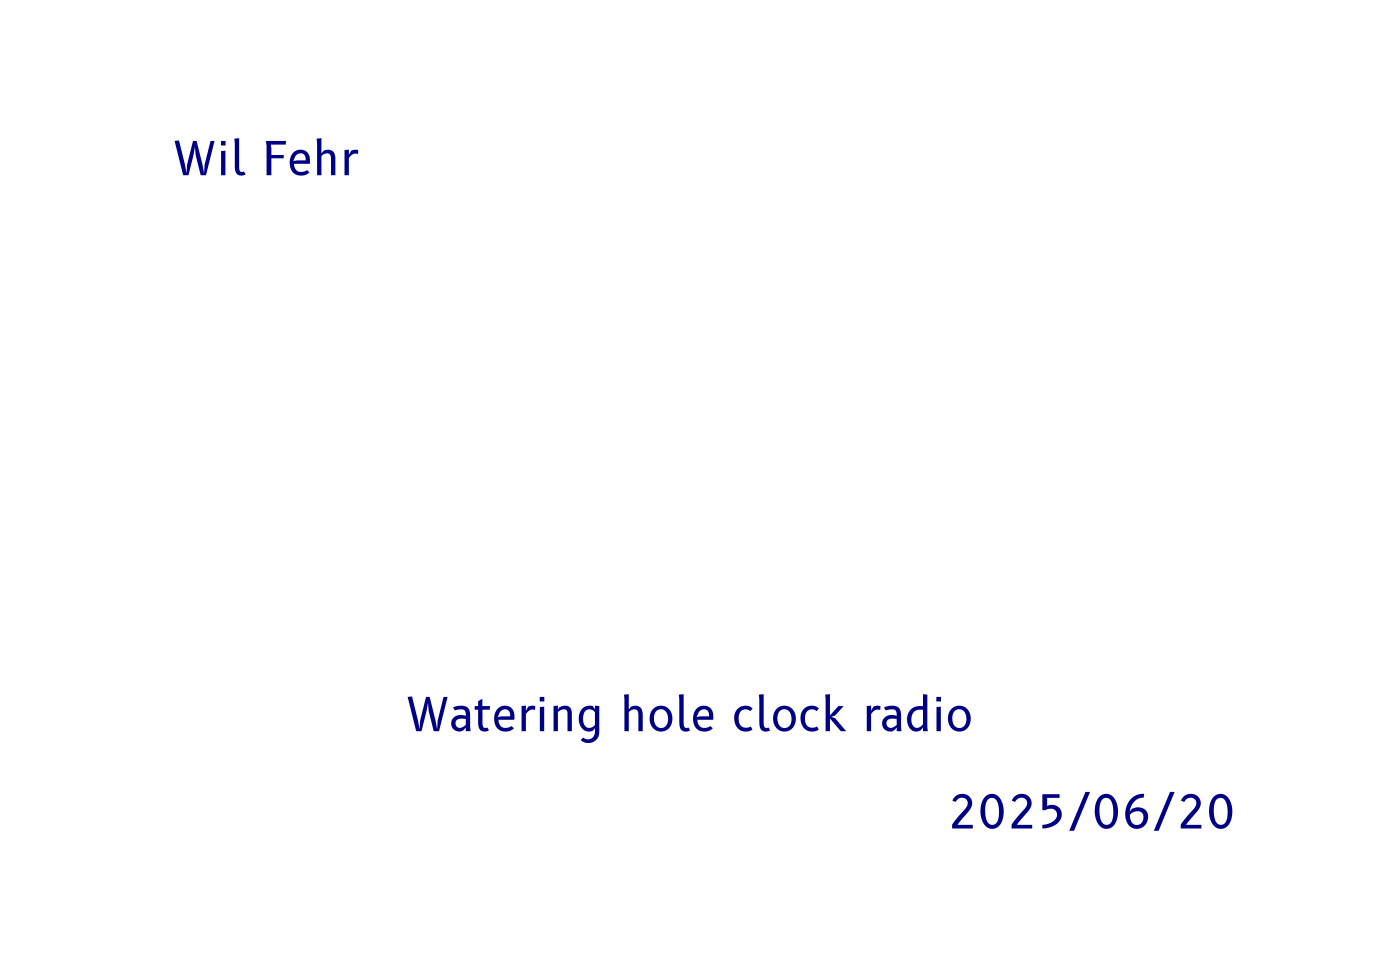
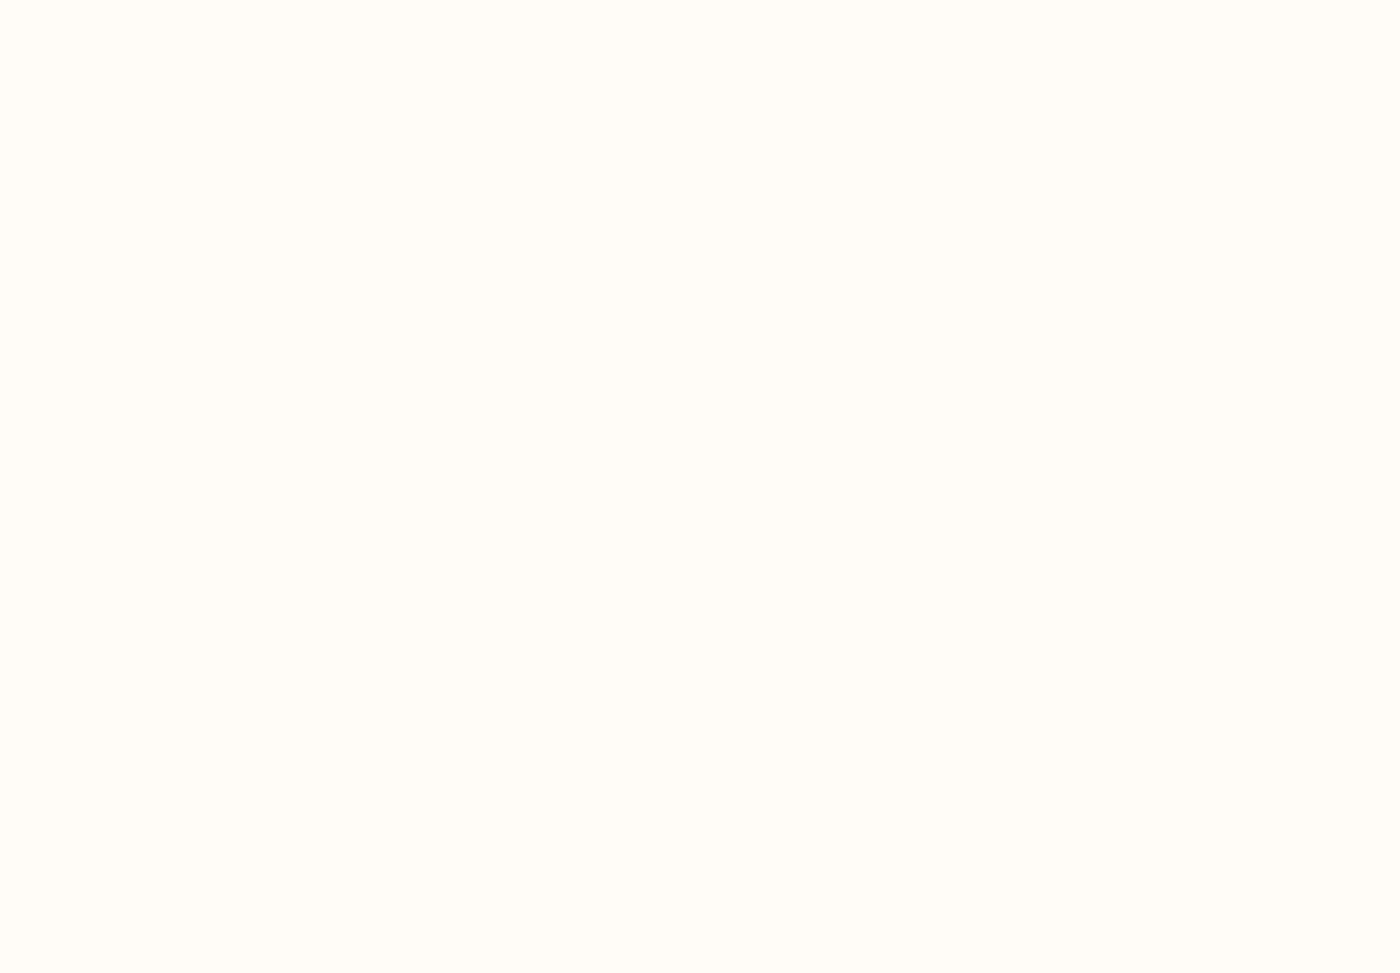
text: Wil Fehr (266, 156) -> none
text: Watering hole clock radio (689, 718) -> none
text: 2025/06/20 (1092, 811) -> none

